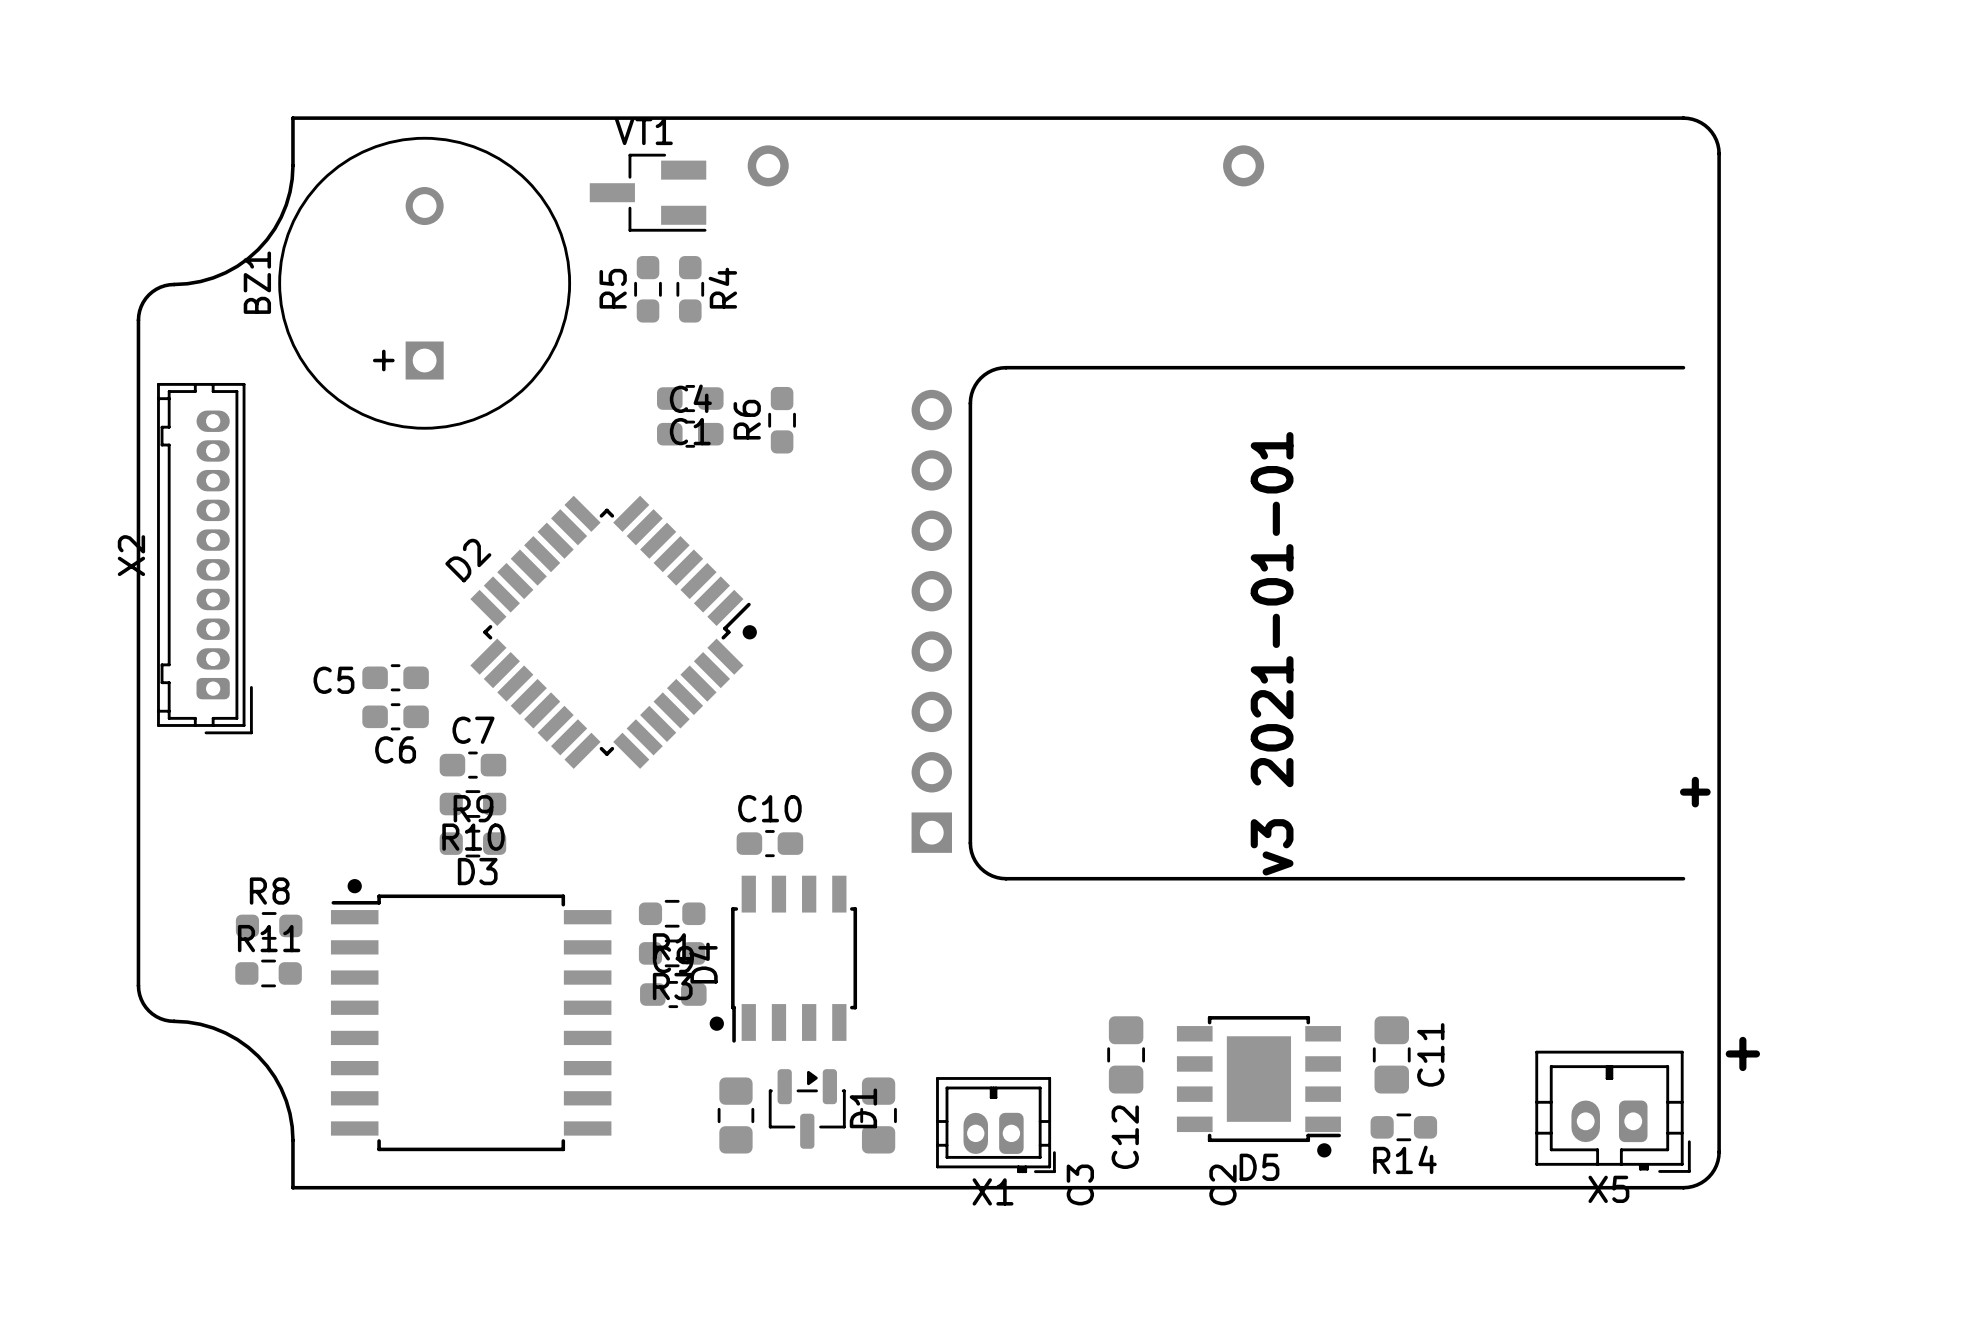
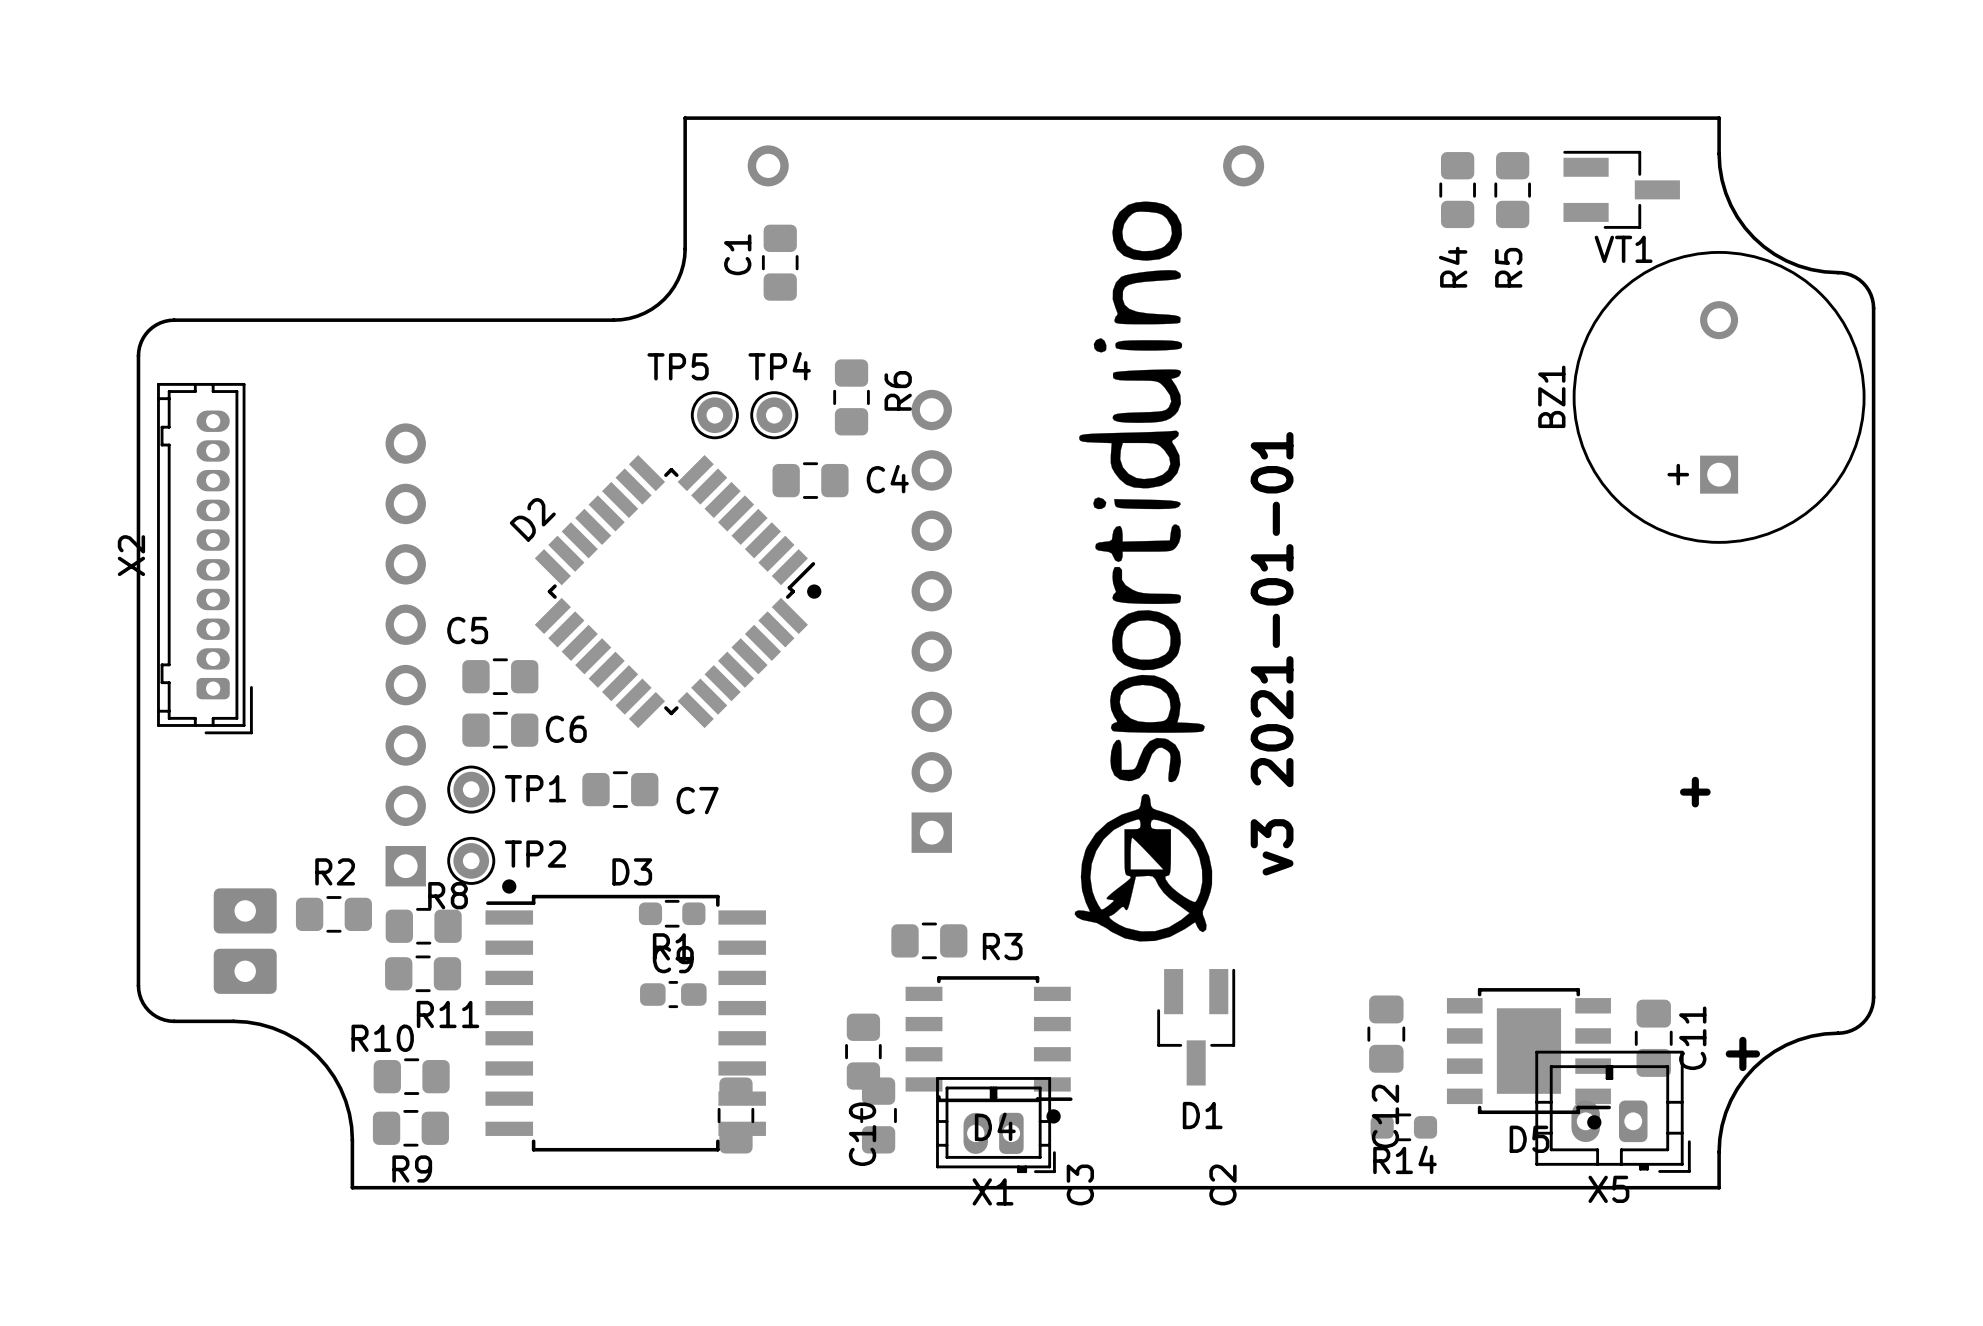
board edge: (685, 118) (292, 118) (292, 178) (286, 204) (274, 228) (258, 249) (225, 272) (200, 281) (164, 285) (148, 294) (141, 306) (138, 315) (138, 355) -> (685, 118) (685, 248) (683, 264) (678, 279) (669, 293) (658, 304) (644, 313) (629, 318) (613, 320) (169, 320) (156, 324) (145, 334) (139, 346) (138, 355)
board edge: (1683, 118) (1697, 120) (1708, 128) (1716, 140) (1719, 153) (1719, 1152) (1716, 1165) (1708, 1177) (1697, 1185) (1683, 1187) -> (1683, 118) (1719, 118) (1719, 167) (1725, 193) (1737, 217) (1753, 237) (1774, 254) (1798, 265) (1824, 271) (1847, 273) (1855, 277) (1868, 290) (1873, 308) (1872, 1006) (1866, 1019) (1855, 1028) (1847, 1032) (1824, 1033) (1798, 1039) (1774, 1051) (1753, 1068) (1737, 1088) (1725, 1112) (1719, 1138) (1719, 1187) (1683, 1187)
VT1 rotation: 0° (648, 192) -> 180° (1621, 189)
VT1 position: (648, 192) -> (1621, 189)
drawing: none -> [1074, 201, 1213, 942]
R5 footprint: [634, 256, 662, 323] -> [1494, 152, 1531, 229]
R4 footprint: [676, 256, 705, 323] -> [1439, 152, 1476, 229]
BZ1 position: (424, 283) -> (1719, 397)
R5 name position: R5 (613, 288) -> R5 (1508, 267)
R4 name position: R4 (722, 288) -> R4 (1453, 267)
board edge: (1683, 367) (1006, 367) (992, 370) (980, 378) (973, 389) (970, 403) (970, 843) (975, 860) (988, 873) (1006, 878) (1683, 878) -> none
C1 footprint: [657, 384, 724, 413] -> [761, 224, 799, 301]
R6 footprint: [768, 386, 796, 454] -> [833, 359, 870, 436]
C4 name position: C4 (690, 398) -> C4 (887, 479)
TP5: none -> (714, 415)
TP4: none -> (774, 415)
R6 name position: R6 (747, 419) -> R6 (898, 390)
C4 footprint: [657, 420, 724, 448] -> [772, 462, 849, 499]
C1 name position: C1 (690, 431) -> C1 (737, 254)
D2 position: (613, 632) -> (678, 591)
part: none -> (405, 654)
C5 footprint: [362, 664, 429, 692] -> [462, 658, 539, 695]
C5 name position: C5 (333, 680) -> C5 (467, 630)
C6 footprint: [362, 703, 429, 731] -> [462, 711, 539, 749]
C7 name position: C7 (473, 730) -> C7 (697, 800)
C6 name position: C6 (395, 749) -> C6 (566, 729)
C7 footprint: [439, 751, 507, 779] -> [582, 771, 659, 808]
TP1: none -> (471, 789)
R10 footprint: [439, 790, 507, 818] -> [373, 1058, 450, 1095]
R9 name position: R9 (473, 808) -> R9 (412, 1169)
C10 name position: C10 (769, 808) -> C10 (862, 1134)
R9 footprint: [439, 829, 507, 858] -> [372, 1109, 449, 1147]
C10 footprint: [736, 830, 804, 858] -> [845, 1013, 882, 1090]
R10 name position: R10 (473, 837) -> R10 (382, 1038)
TP2: none -> (471, 860)
R8 footprint: [235, 912, 303, 940] -> [385, 907, 462, 945]
R2: none -> (333, 914)
R11 name position: R11 (269, 938) -> R11 (448, 1014)
R3 footprint: [638, 939, 706, 968] -> [891, 922, 968, 960]
part: none -> (245, 941)
R11 footprint: [235, 959, 302, 988] -> [385, 955, 462, 993]
D4 rotation: 0° (783, 959) -> 90° counterclockwise (989, 1049)
D4 position: (783, 959) -> (989, 1049)
R3 name position: R3 (672, 986) -> R3 (1002, 946)
D3 position: (471, 1015) -> (625, 1015)
board edge: (174, 1021) (200, 1024) (225, 1033) (248, 1047) (267, 1066) (281, 1088) (289, 1113) (292, 1140) (292, 1187) (352, 1187) -> (174, 1021) (233, 1021) (259, 1024) (296, 1039) (317, 1056) (340, 1088) (349, 1113) (352, 1140) (352, 1187)
C12 position: (1126, 1054) -> (1386, 1034)
C11 position: (1391, 1054) -> (1653, 1038)
D1 footprint: [768, 1069, 846, 1149] -> [1157, 968, 1236, 1086]
D5 position: (1258, 1086) -> (1528, 1058)
D1 name position: D1 (863, 1108) -> D1 (1202, 1115)

